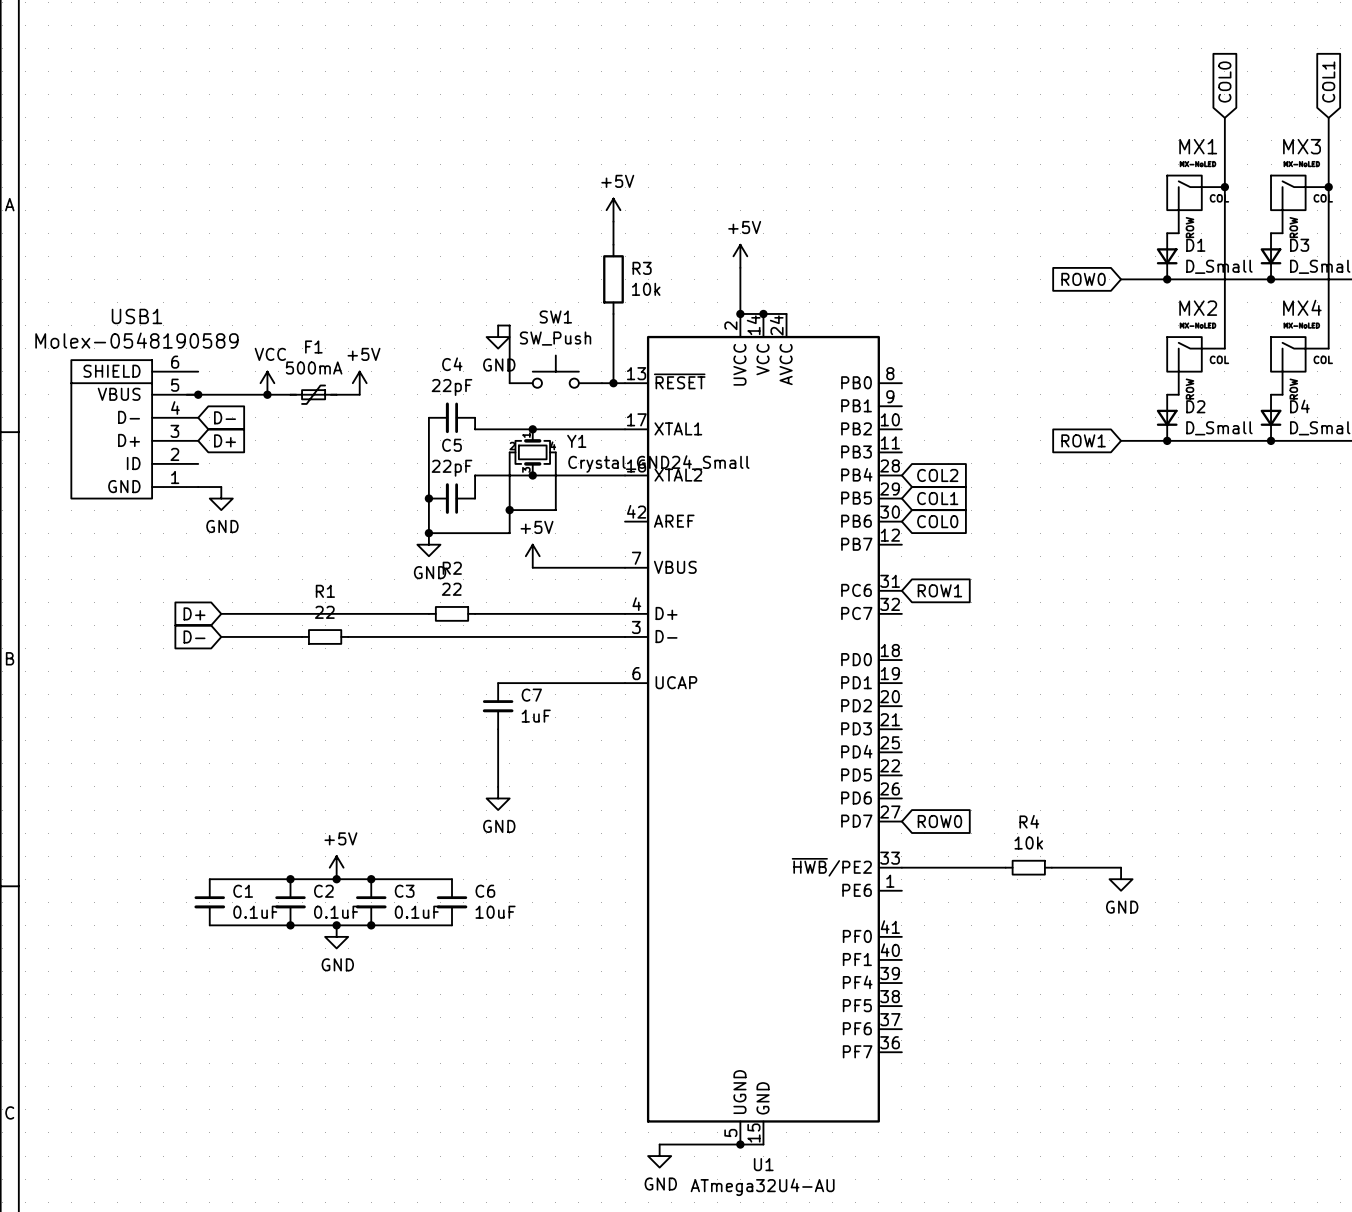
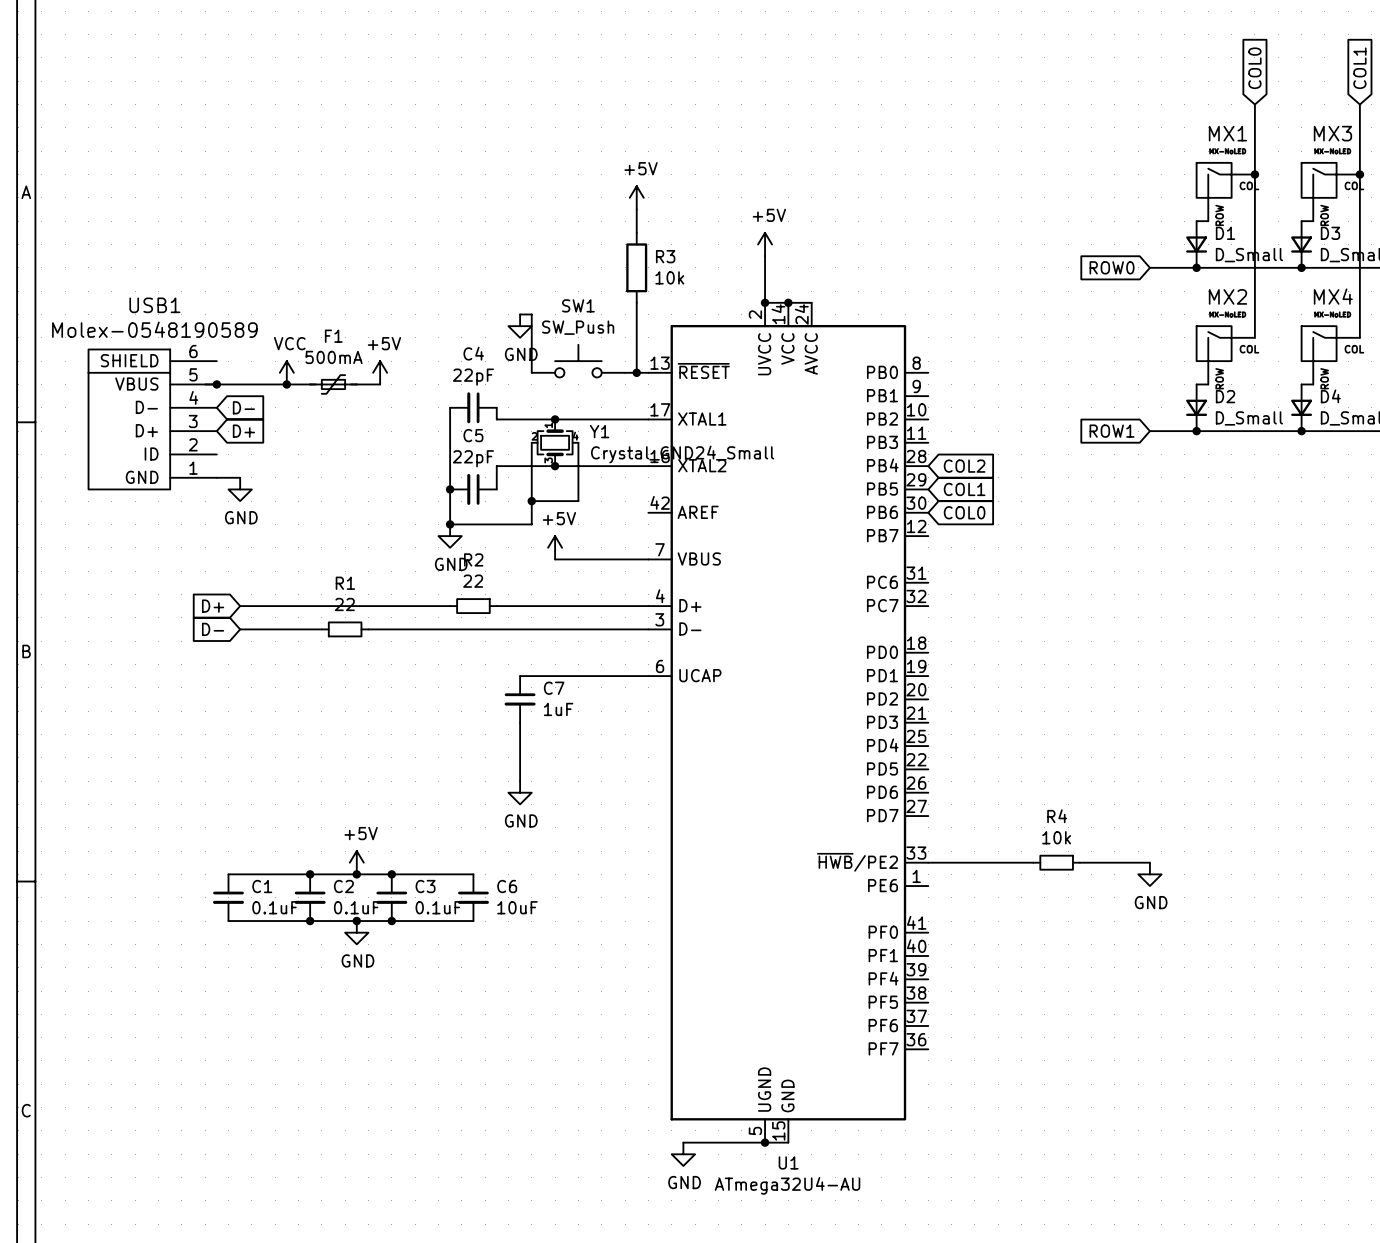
global label: ROW1 (939, 590) -> none
global label: ROW0 (939, 821) -> none

